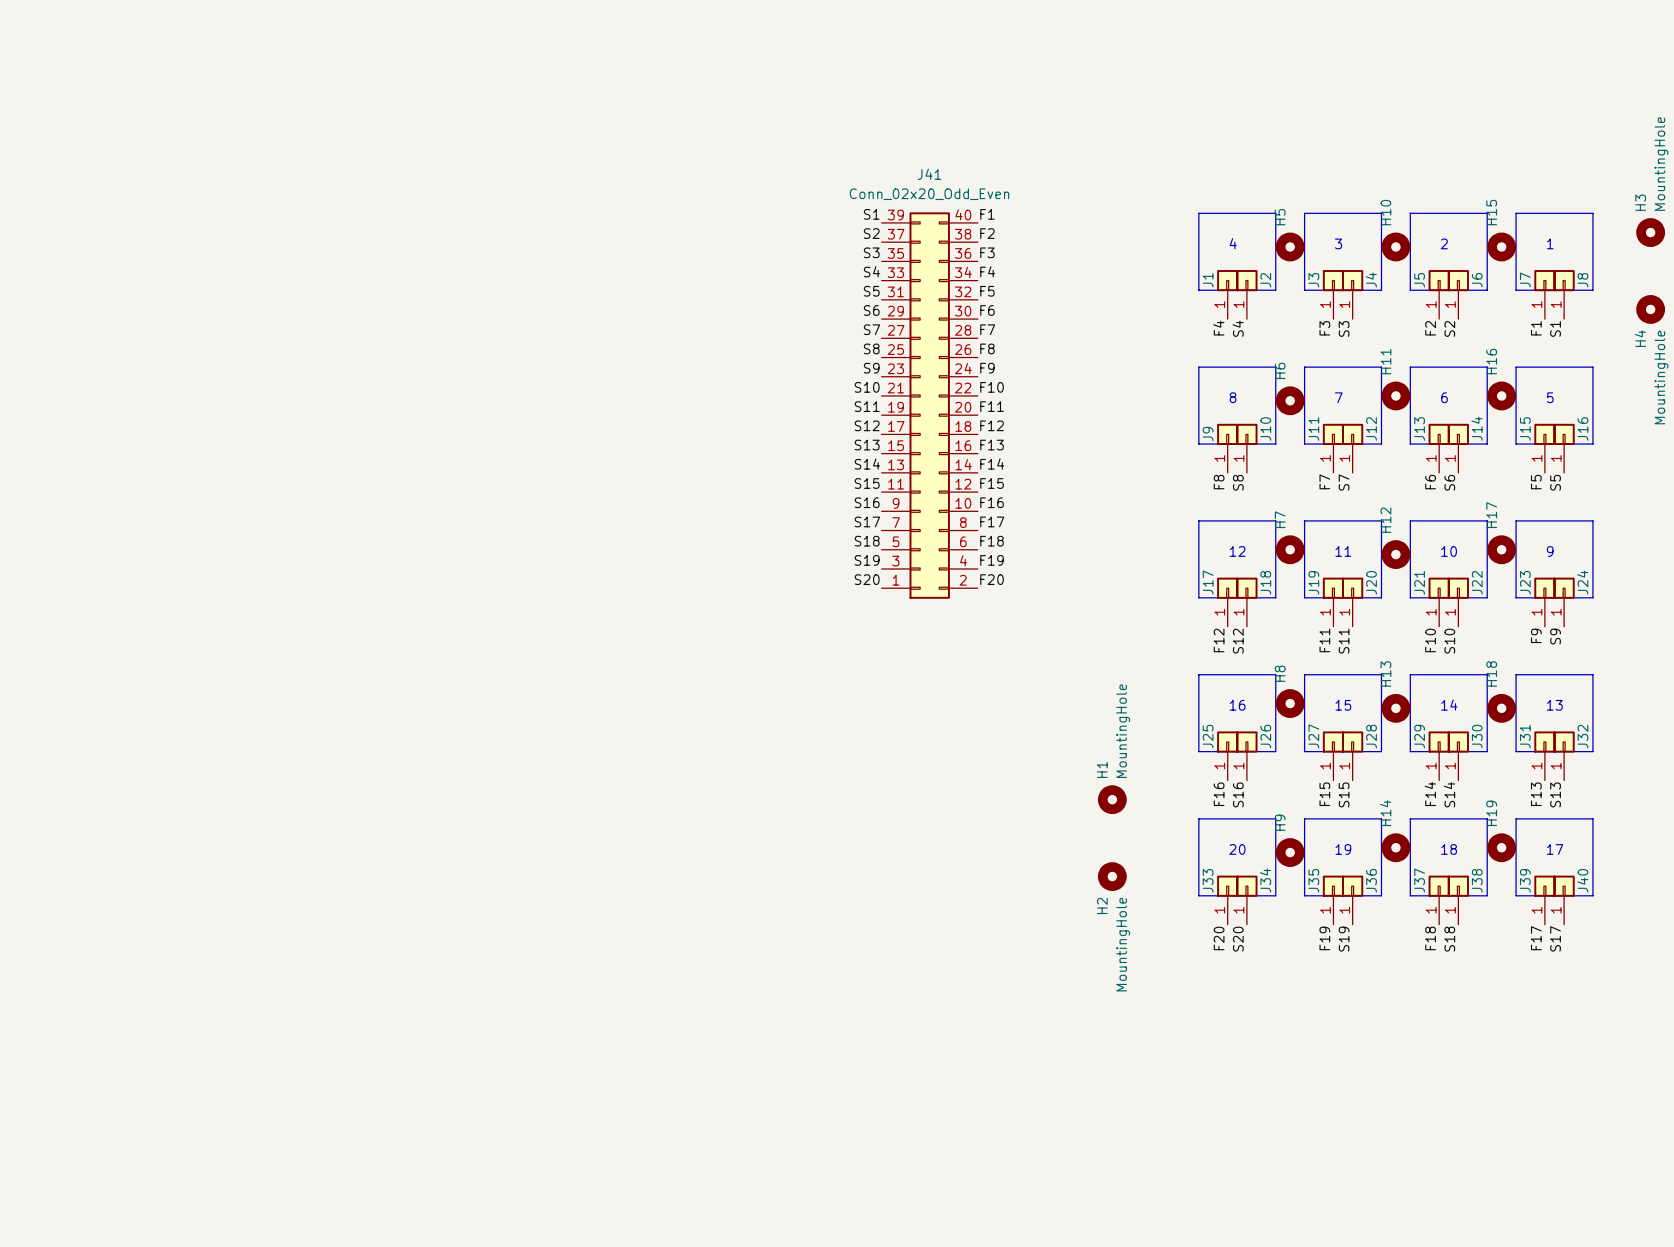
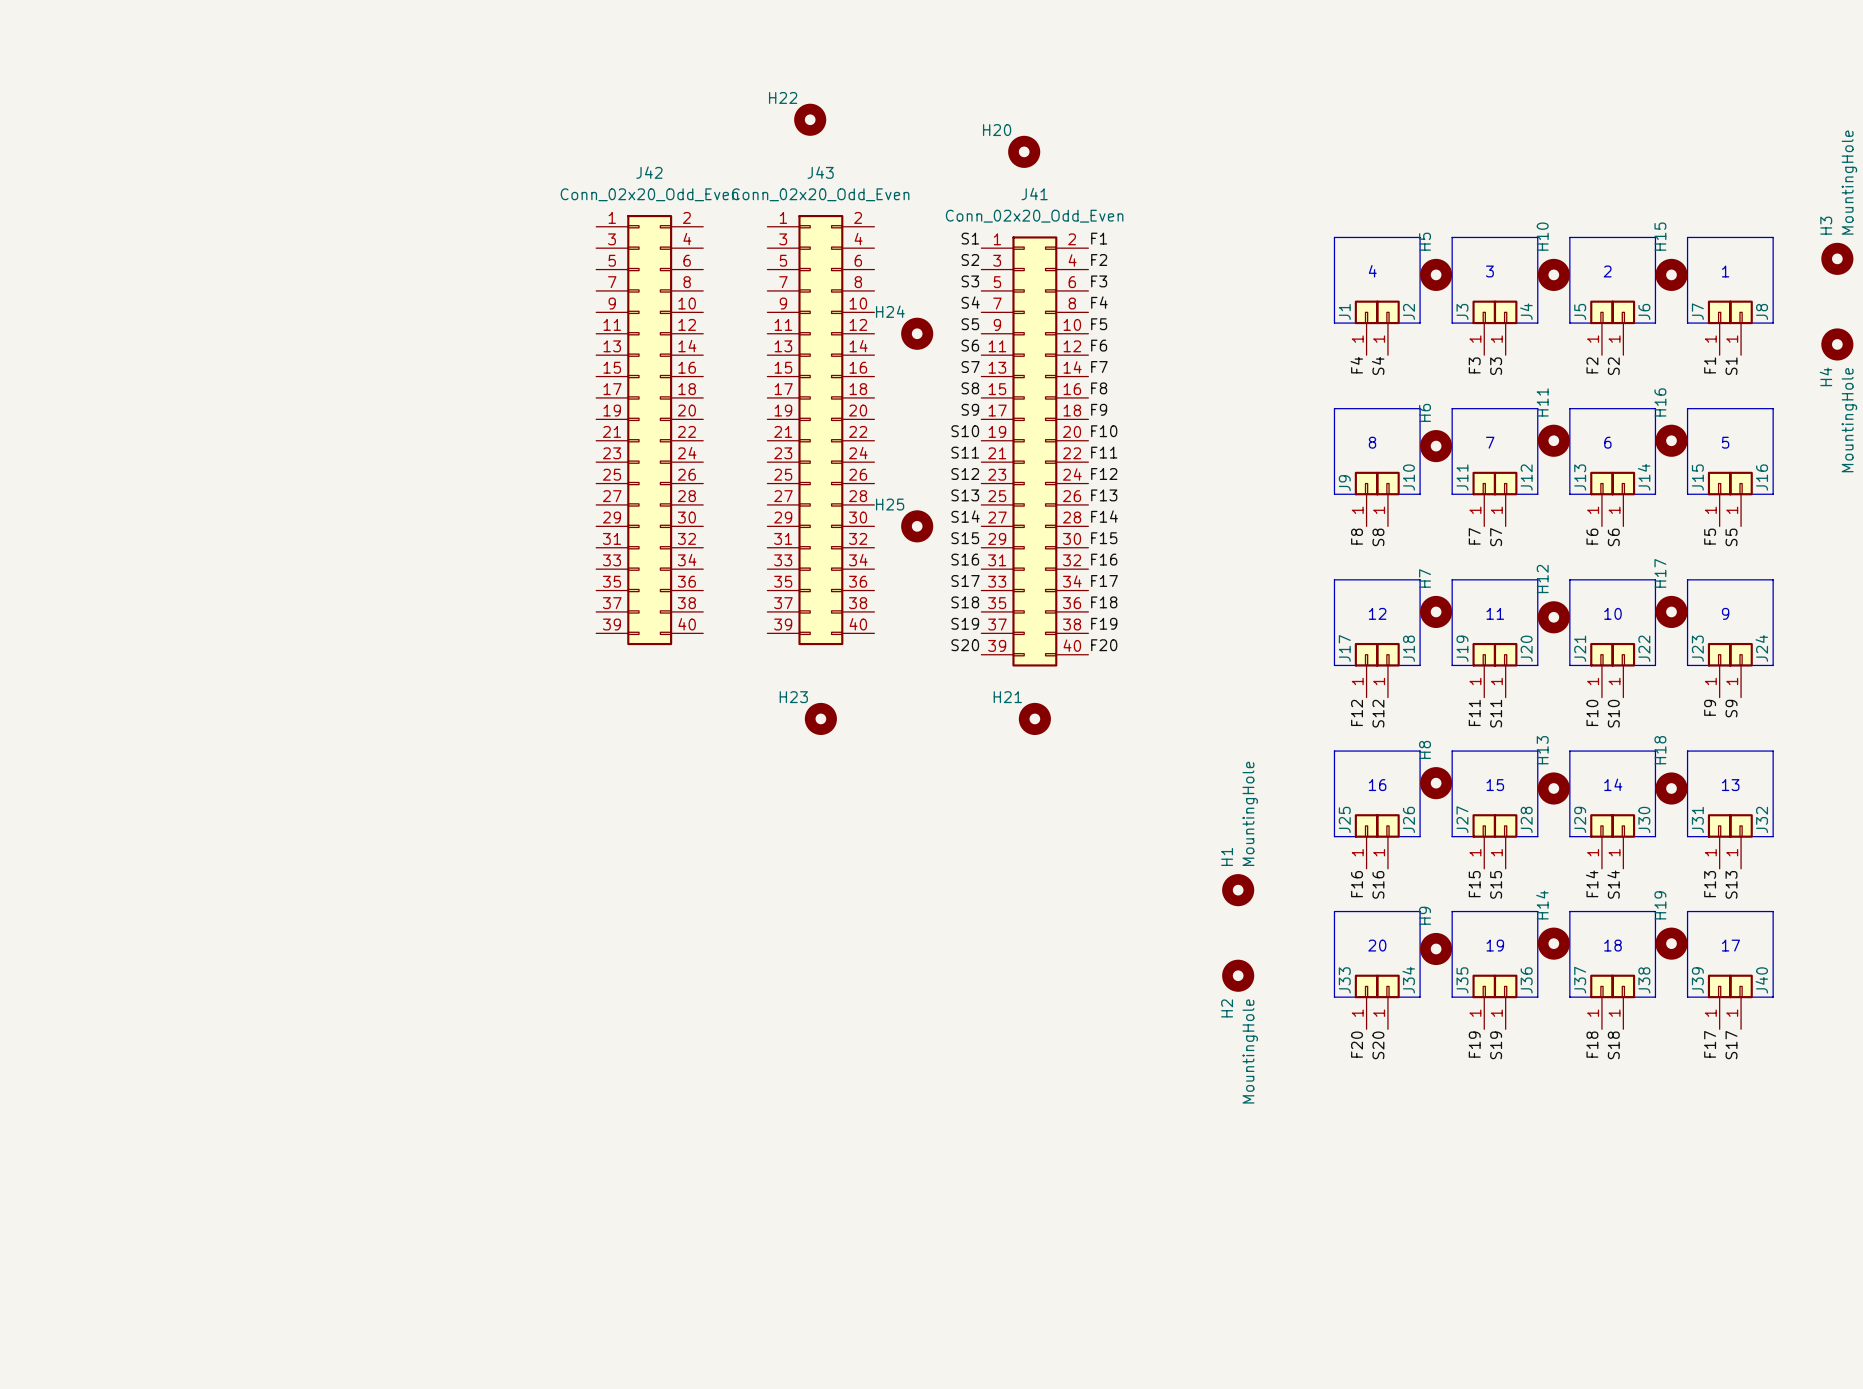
H22: none -> (810, 119)
H20: none -> (1024, 151)
H24: none -> (917, 333)
J42: none -> Conn_02x20_Odd_Even (649, 430)
J43: none -> Conn_02x20_Odd_Even (820, 430)
J41 flip: as is (929, 405) -> up-down (1034, 451)
H25: none -> (917, 526)
H23: none -> (820, 718)
H21: none -> (1034, 718)

